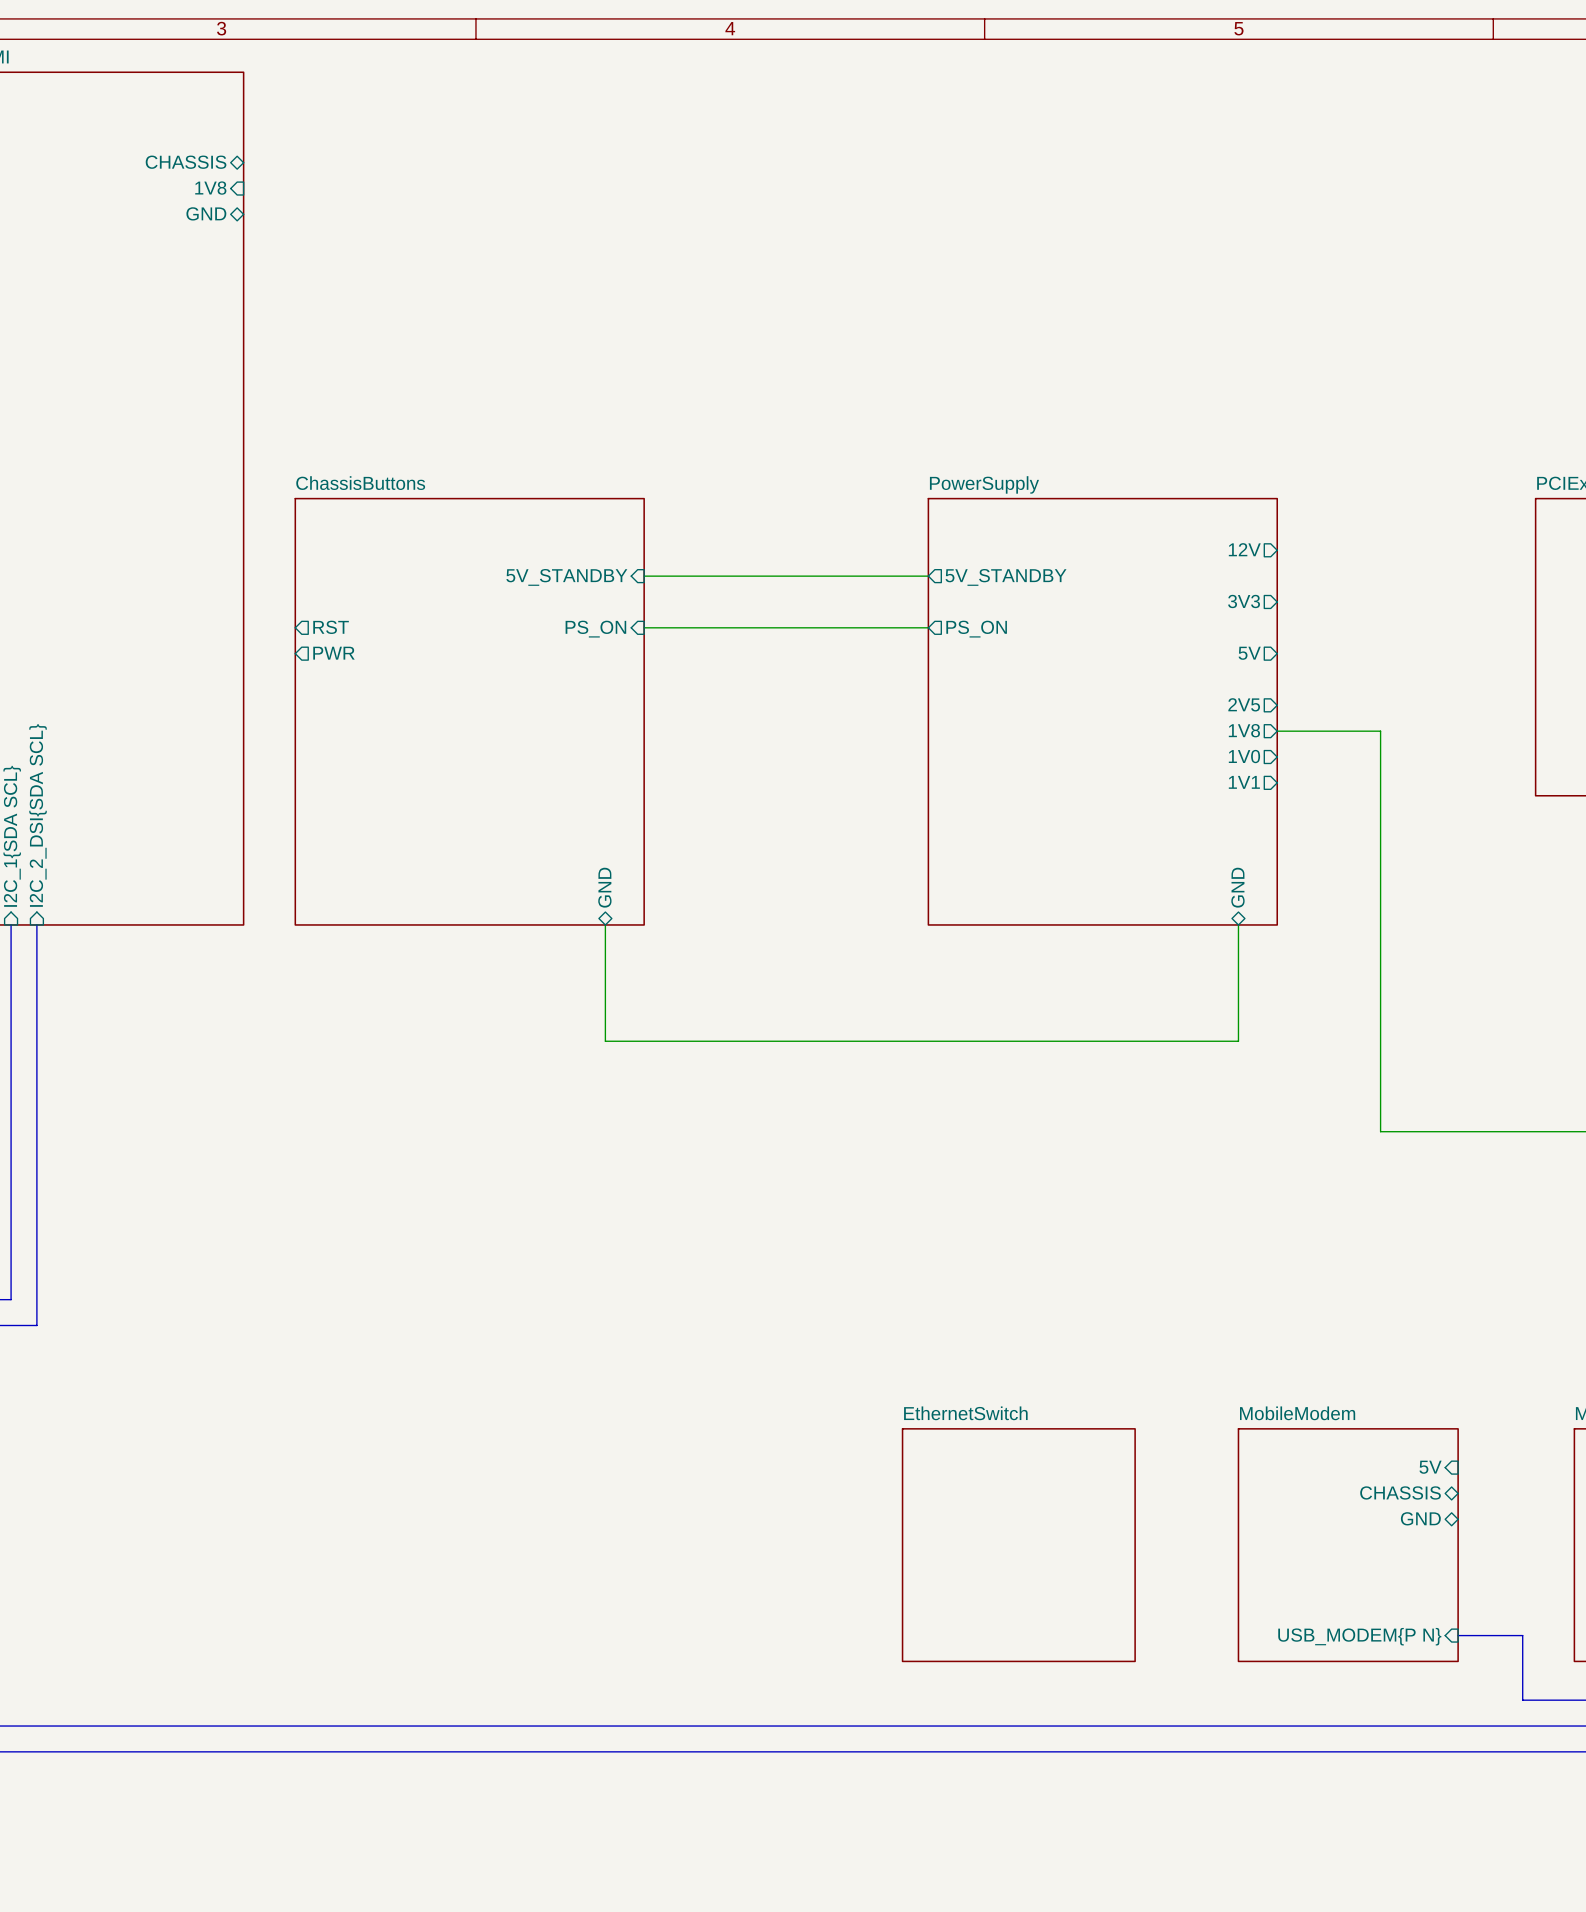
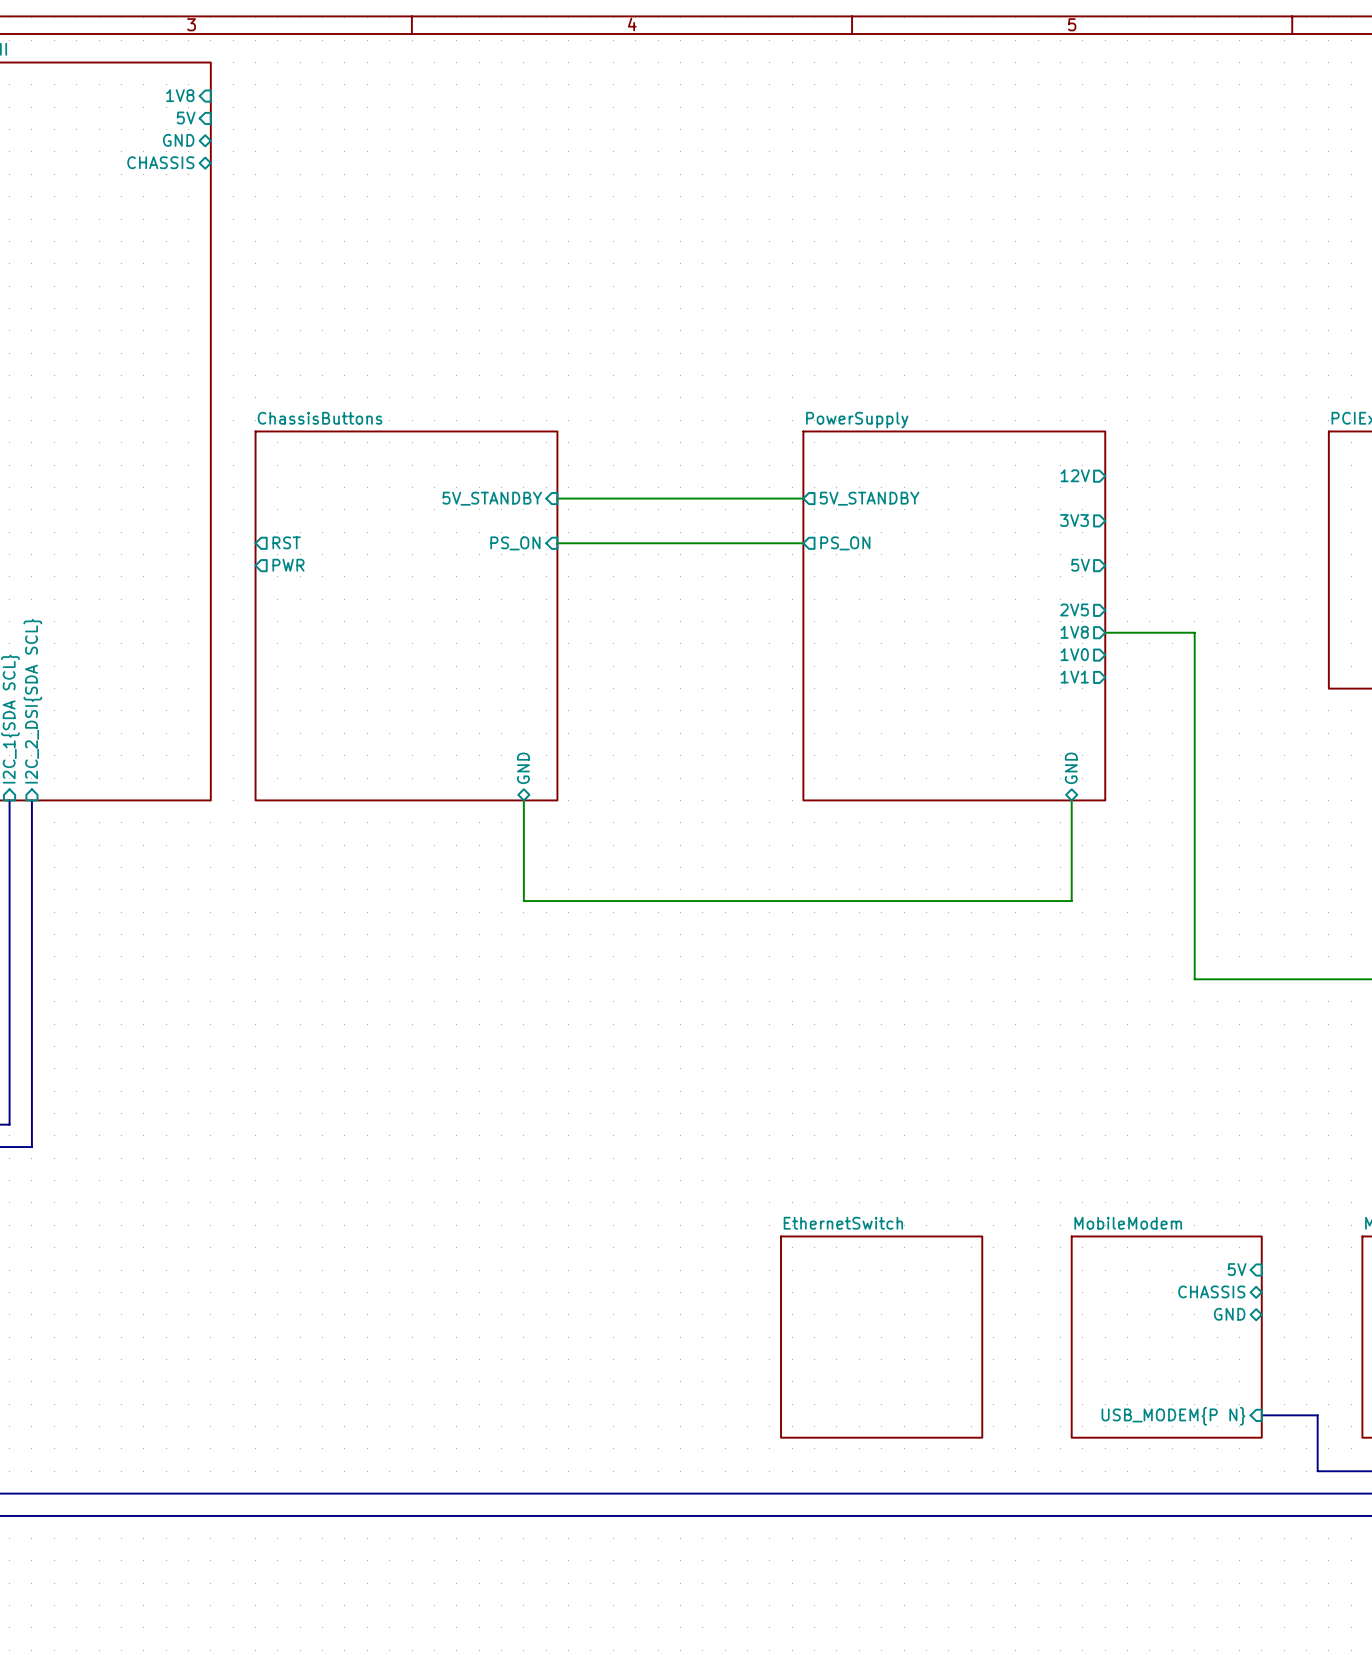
sheet pin: none -> 1V8 (180, 95)
sheet pin: none -> 5V (186, 118)
sheet pin: CHASSIS (186, 162) -> GND (178, 140)
sheet pin shape: input (210, 188) -> bidirectional (160, 162)
sheet pin: 1V8 (210, 188) -> CHASSIS (160, 162)
sheet pin: GND (206, 213) -> none

